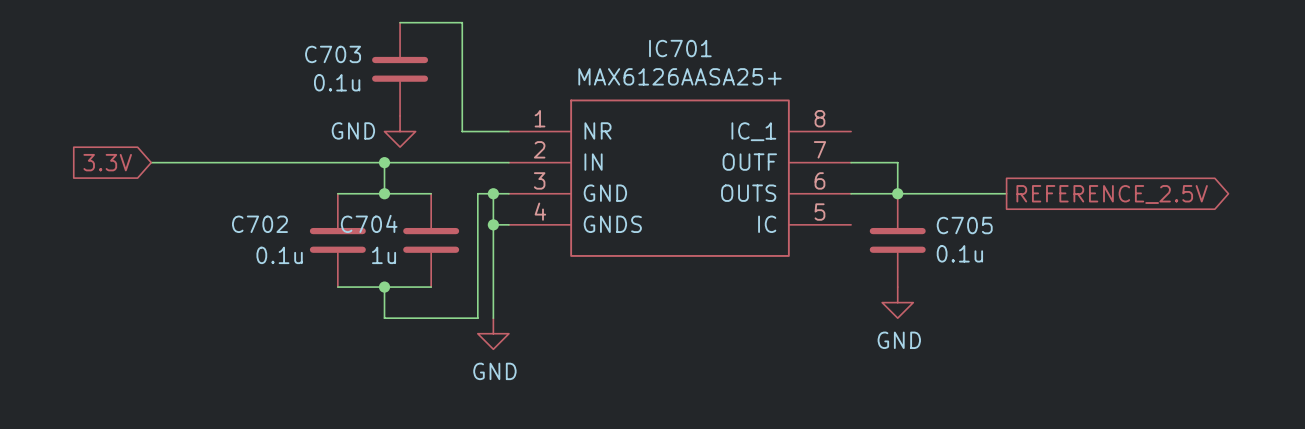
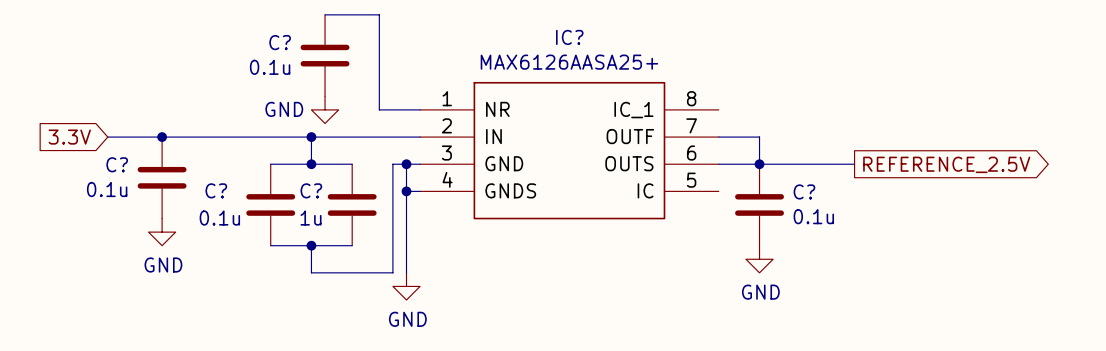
IC701 name: IC701 (680, 48) -> IC? (569, 37)
C703 name: C703 (333, 54) -> C? (280, 42)
junction: none -> (162, 137)
C?: none -> 0.1u (162, 177)
C704 name: C704 (369, 223) -> C? (311, 190)
C702 name: C702 (259, 224) -> C? (216, 190)
C705 name: C705 (964, 225) -> C? (804, 191)
power symbol: none -> GND (162, 232)

